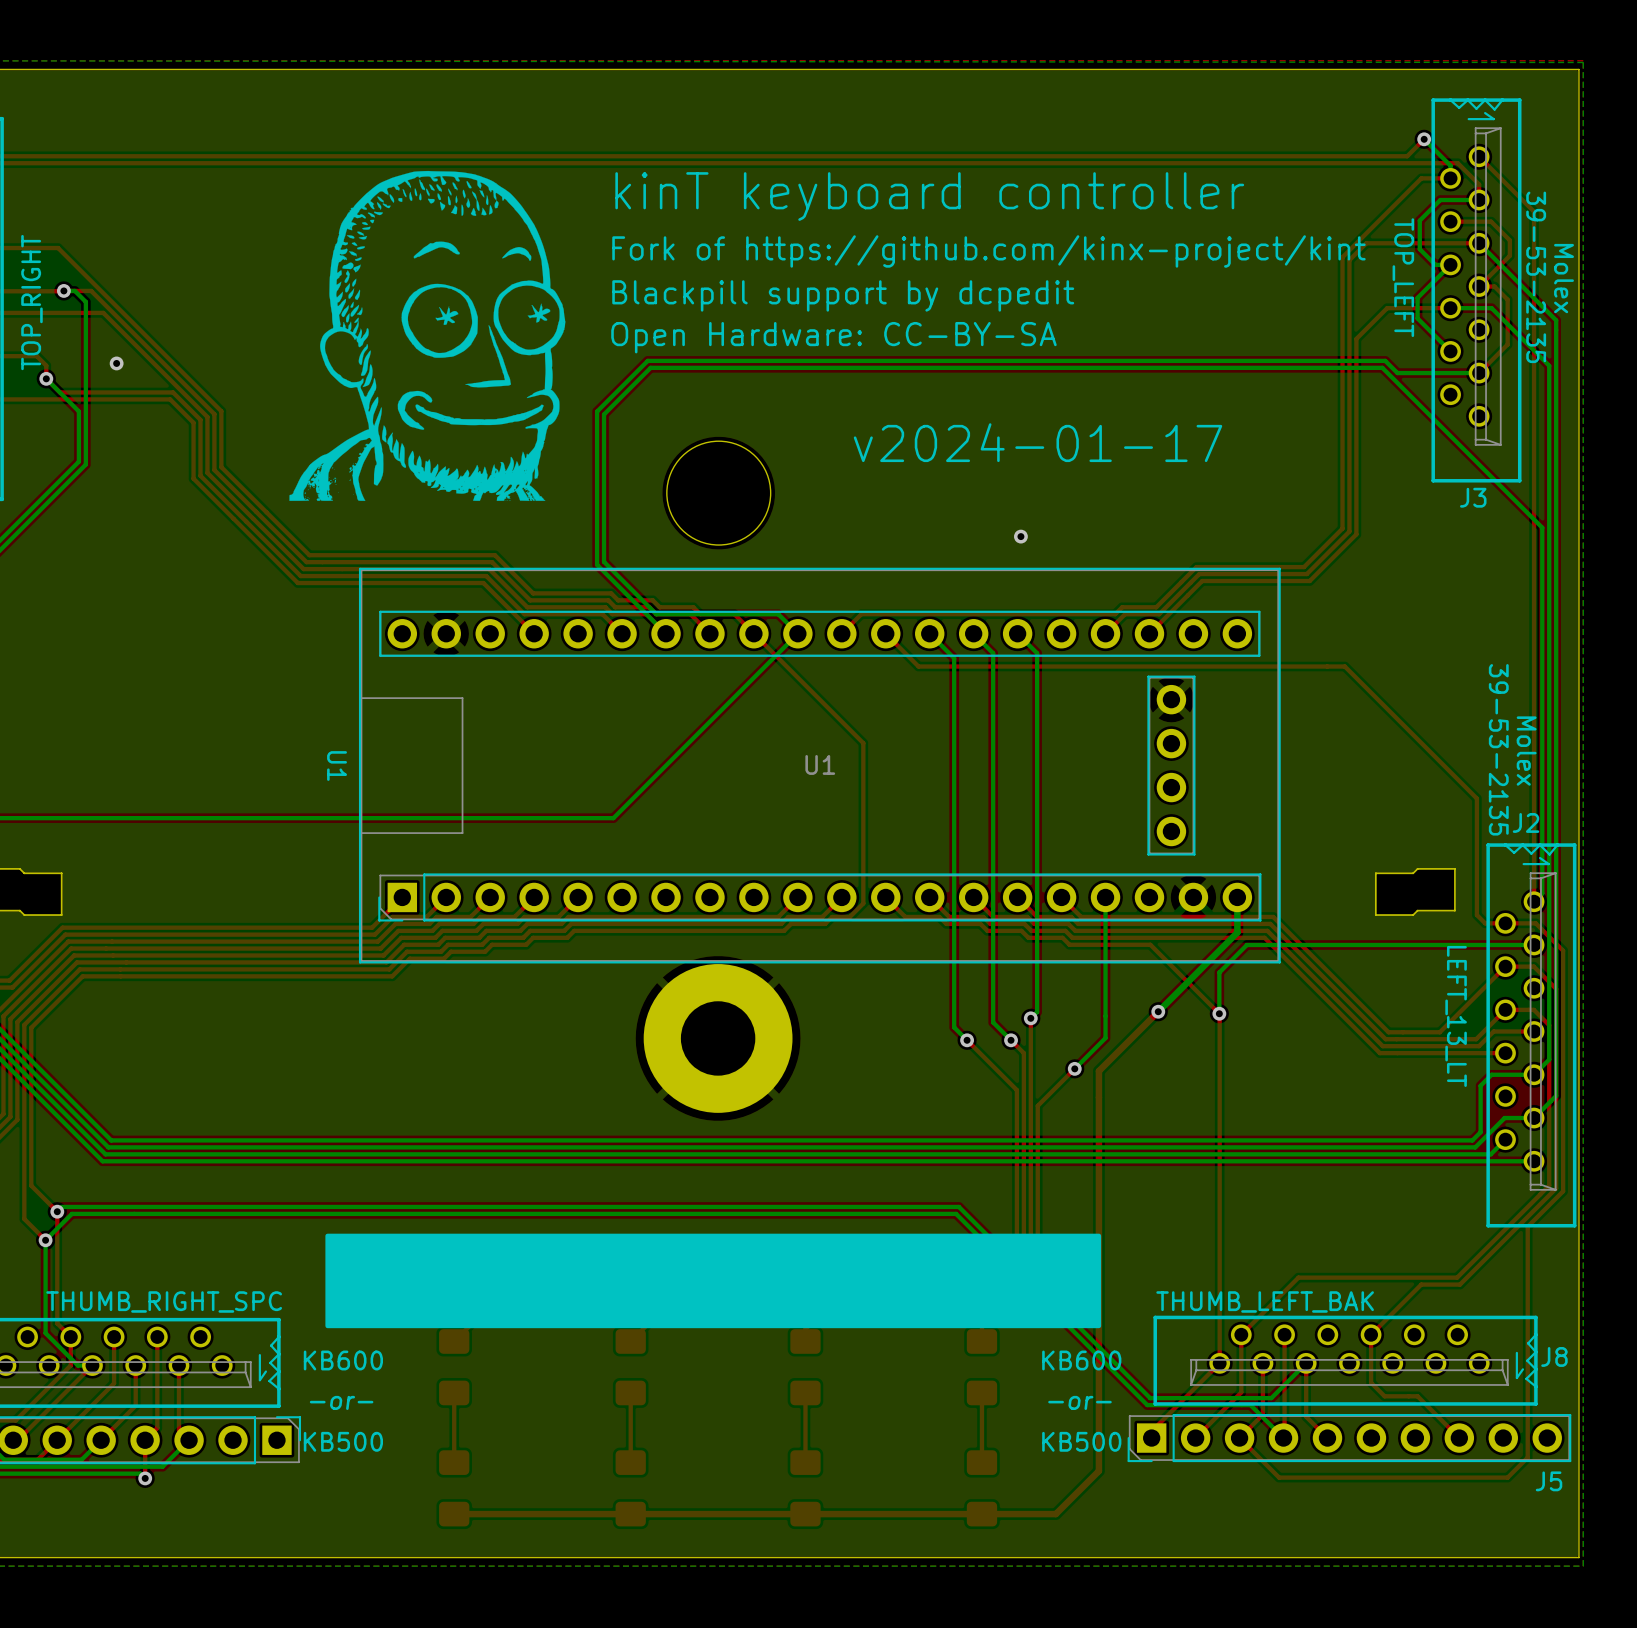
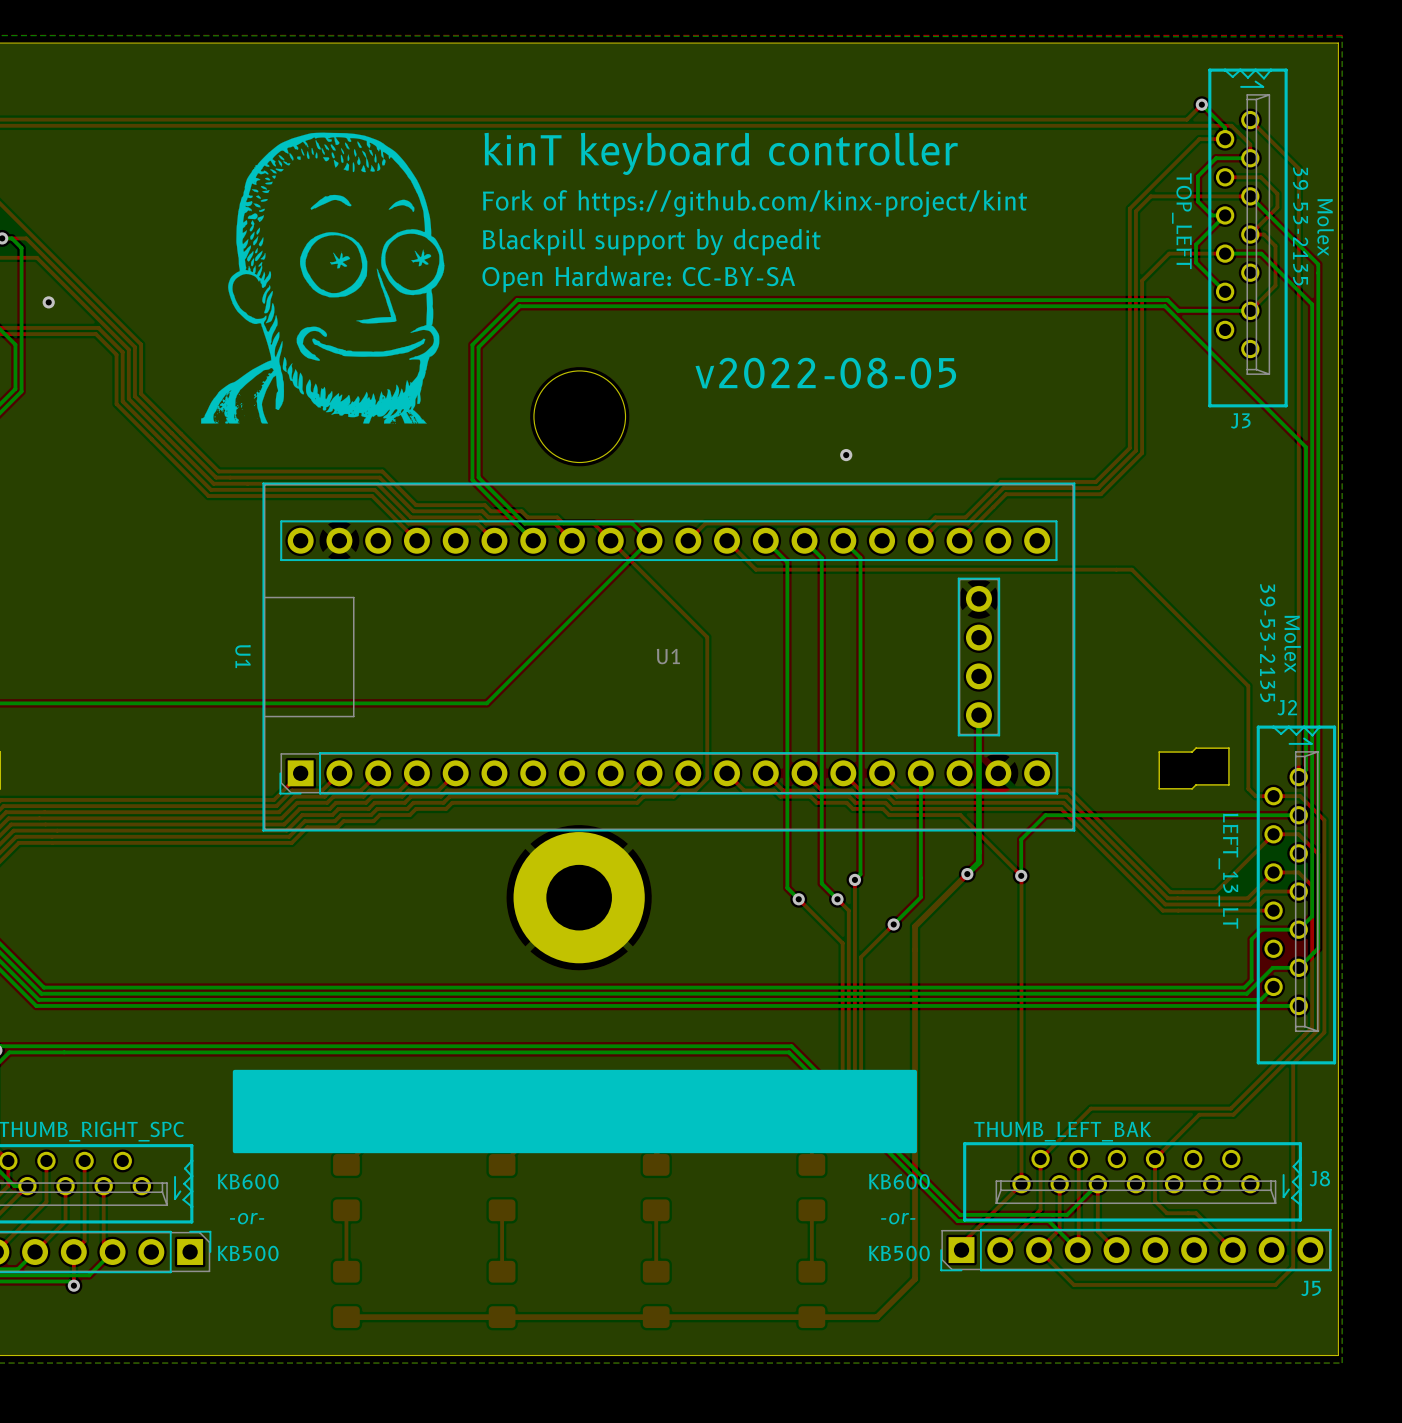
text: v2024-01-17 (1037, 442) -> v2022-08-05 (825, 373)
bottom track: (1237, 897) (1237, 932) (1171, 998) -> (978, 715) (978, 862)

